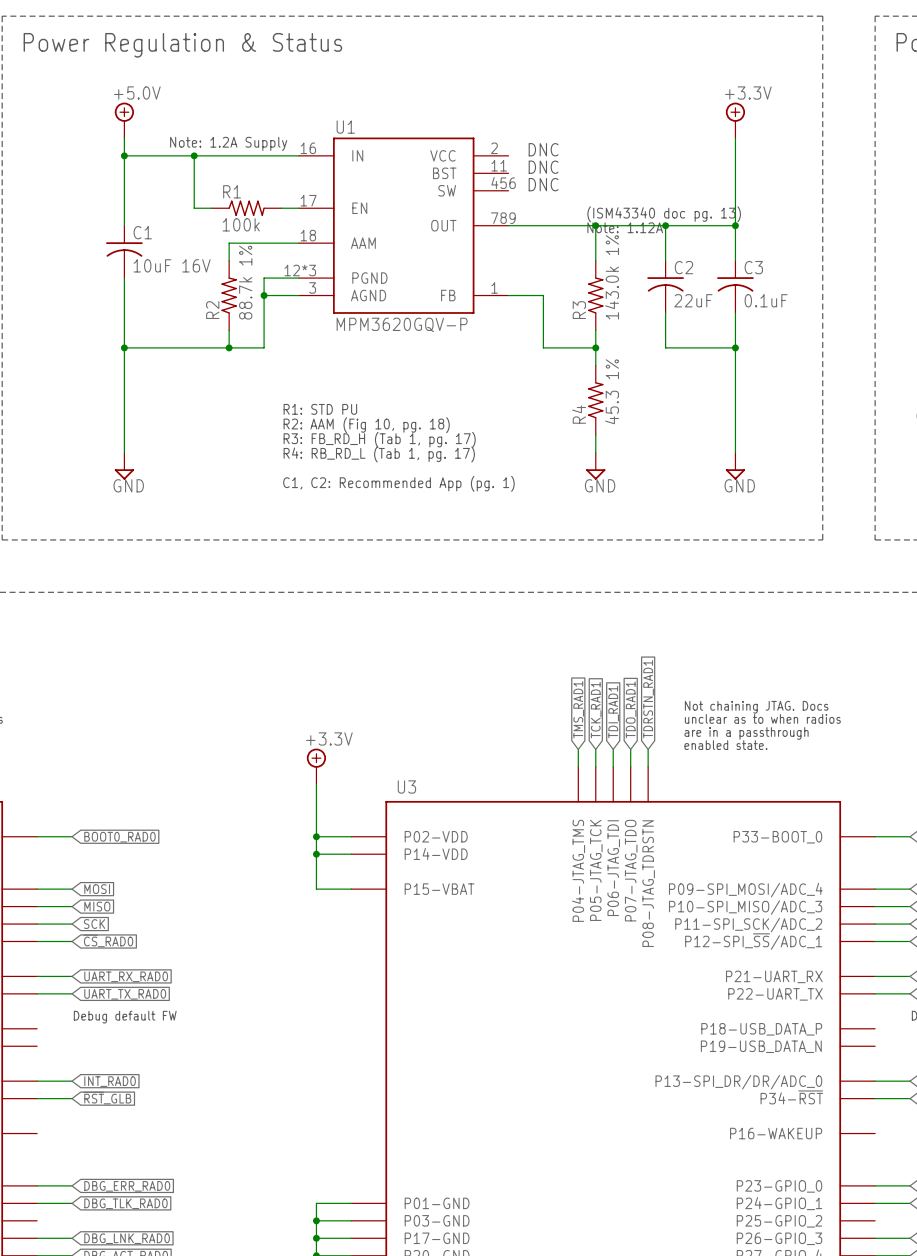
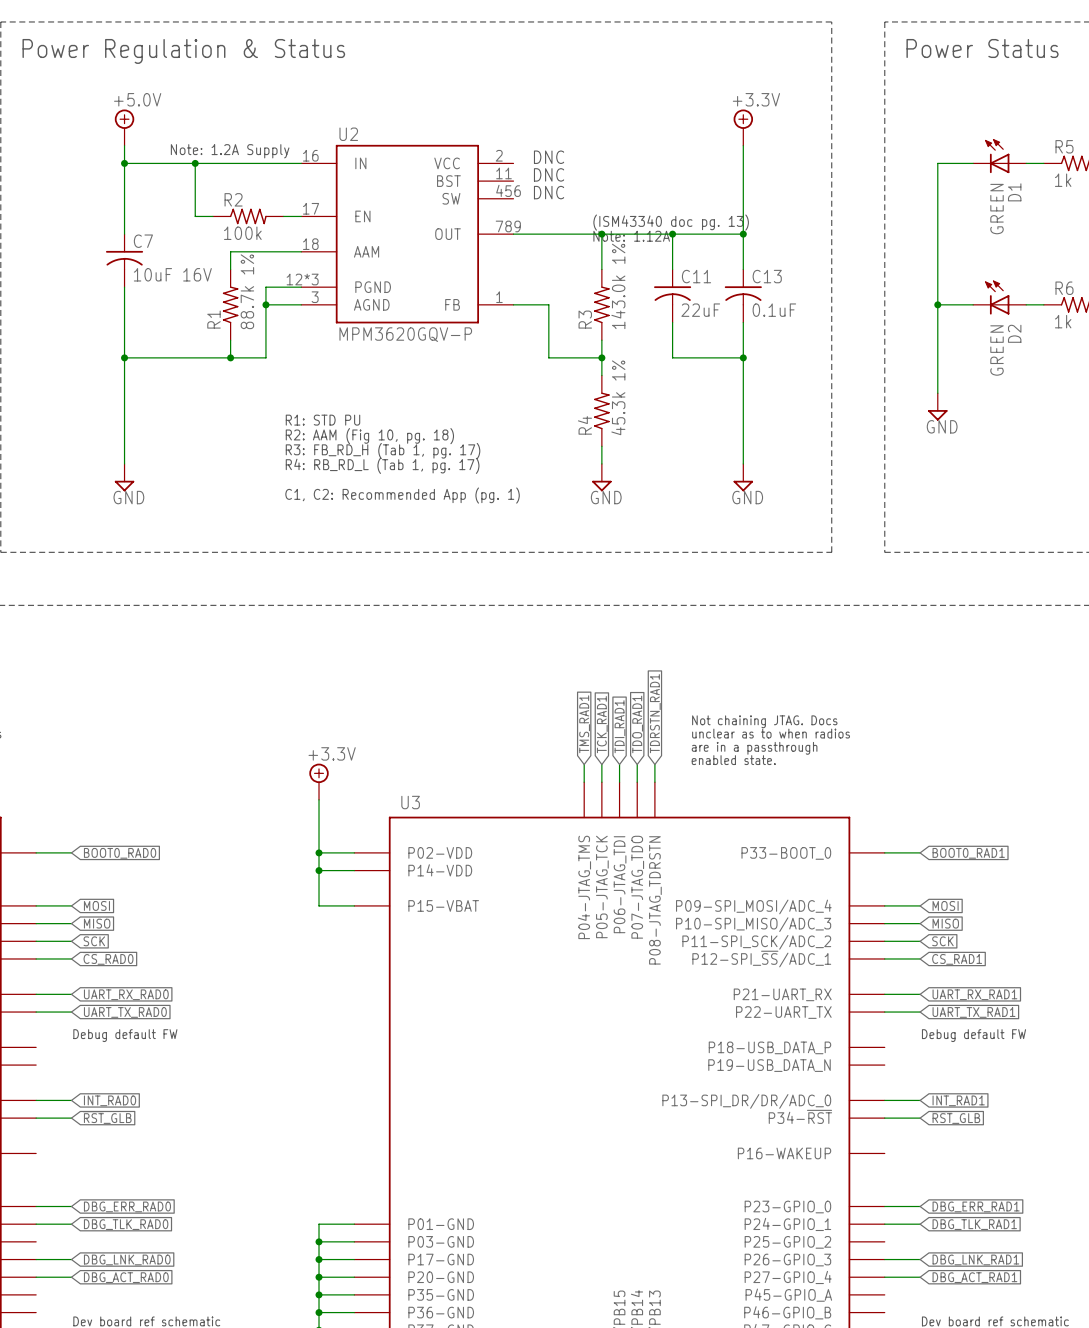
U1 name: U1 (345, 127) -> U2 (348, 134)
R1 name: R1 (232, 191) -> R2 (233, 199)
C1 name: C1 (142, 232) -> C7 (143, 241)
C2 name: C2 (683, 267) -> C11 (696, 276)
C3 name: C3 (753, 267) -> C13 (767, 276)
R2 name: R2 (212, 310) -> R1 (213, 319)
R4 value: 45.3 1% (612, 391) -> 45.3k 1% (618, 397)

